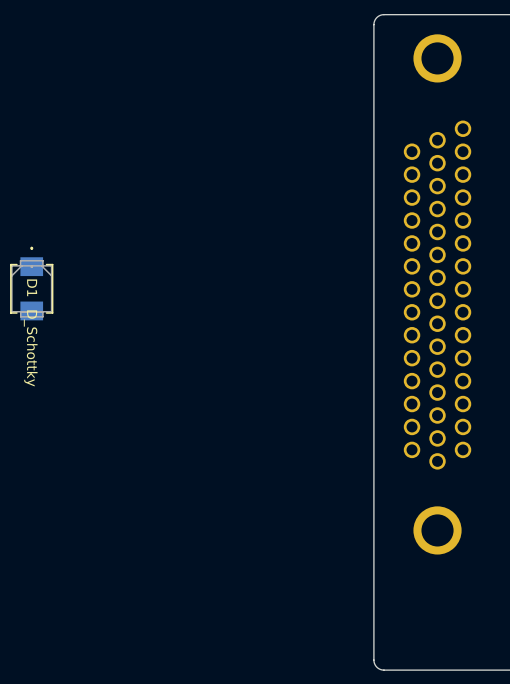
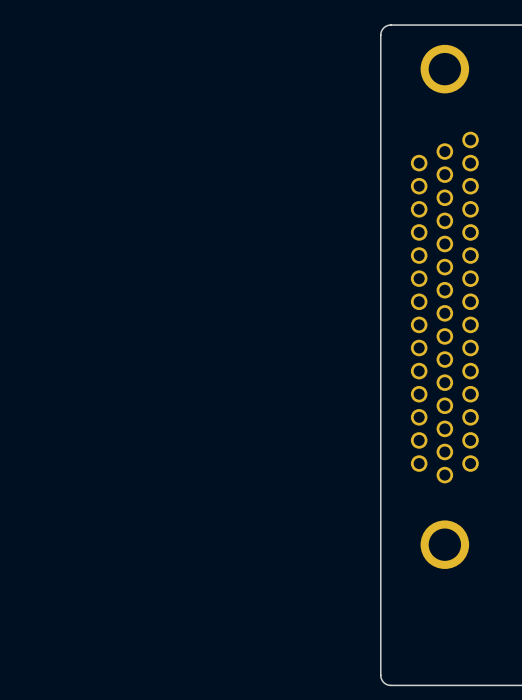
D1: D_Schottky (31, 283) -> none

